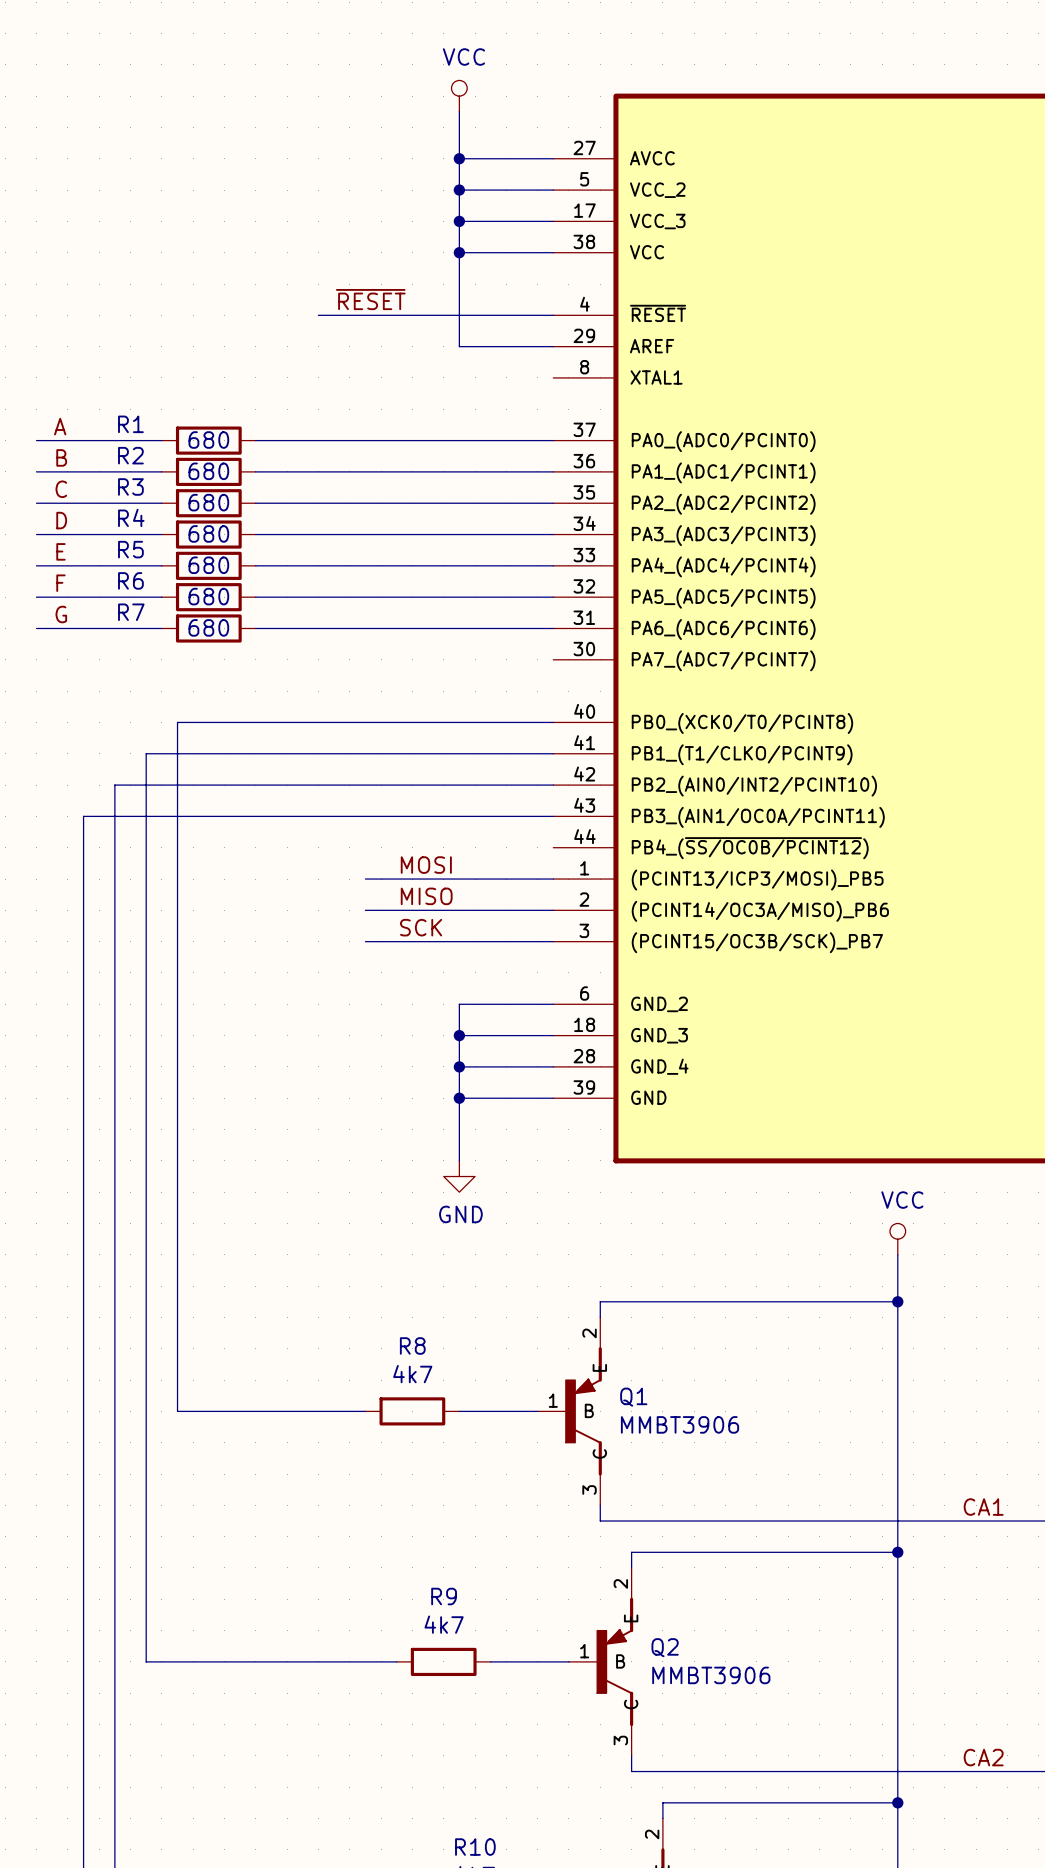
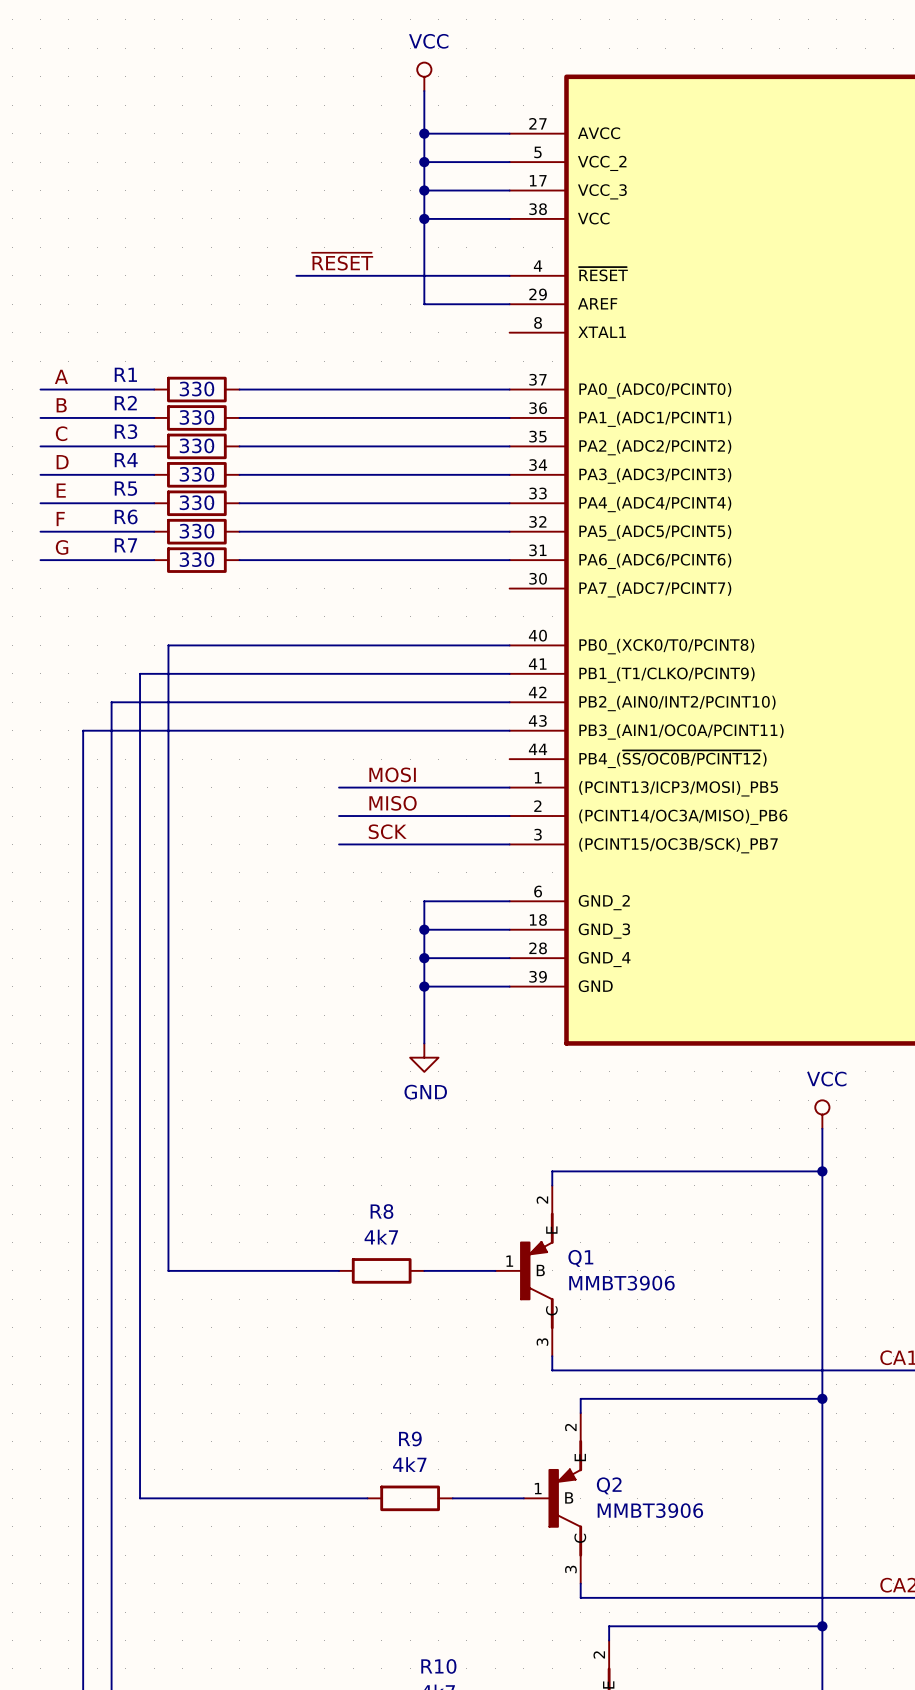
R1 value: 680 (208, 440) -> 330 (196, 389)
R2 value: 680 (208, 471) -> 330 (196, 417)
R3 value: 680 (208, 502) -> 330 (196, 445)
R4 value: 680 (208, 533) -> 330 (196, 474)
R5 value: 680 (208, 565) -> 330 (196, 502)
R6 value: 680 (208, 596) -> 330 (196, 531)
R7 value: 680 (208, 627) -> 330 (196, 559)

